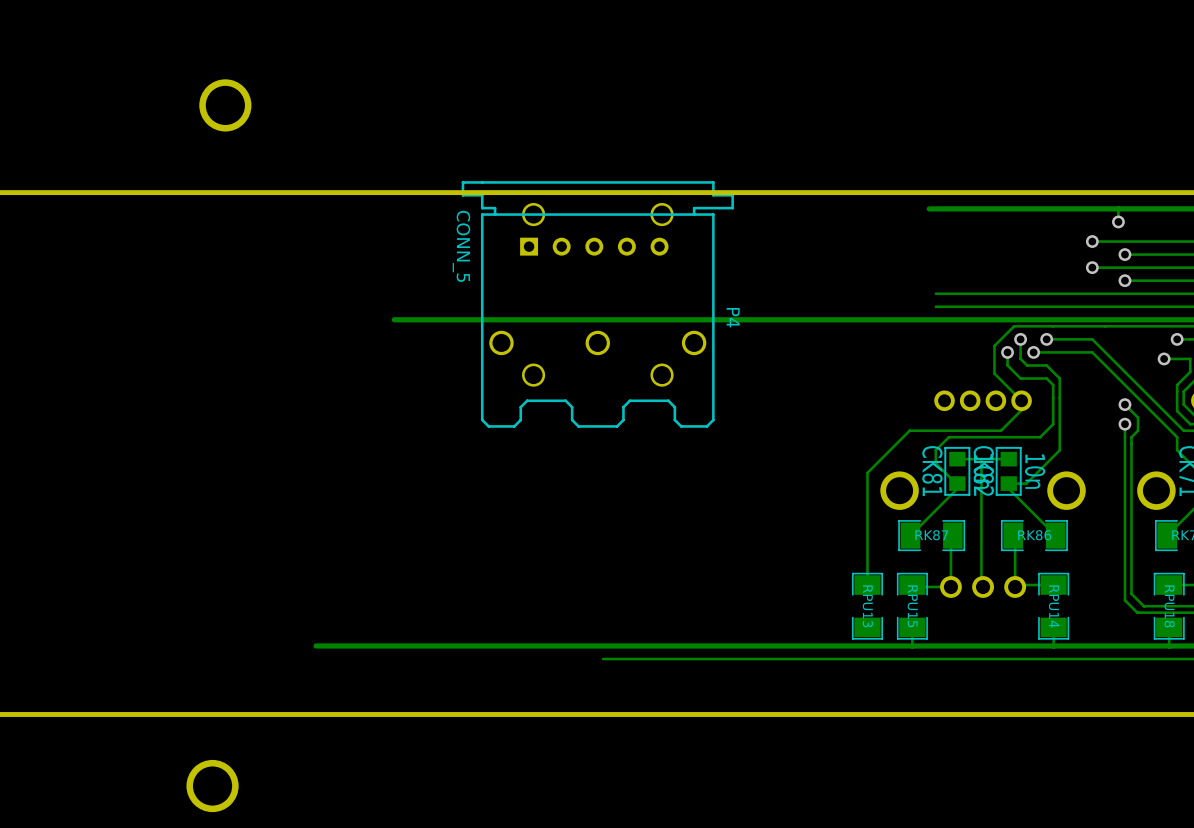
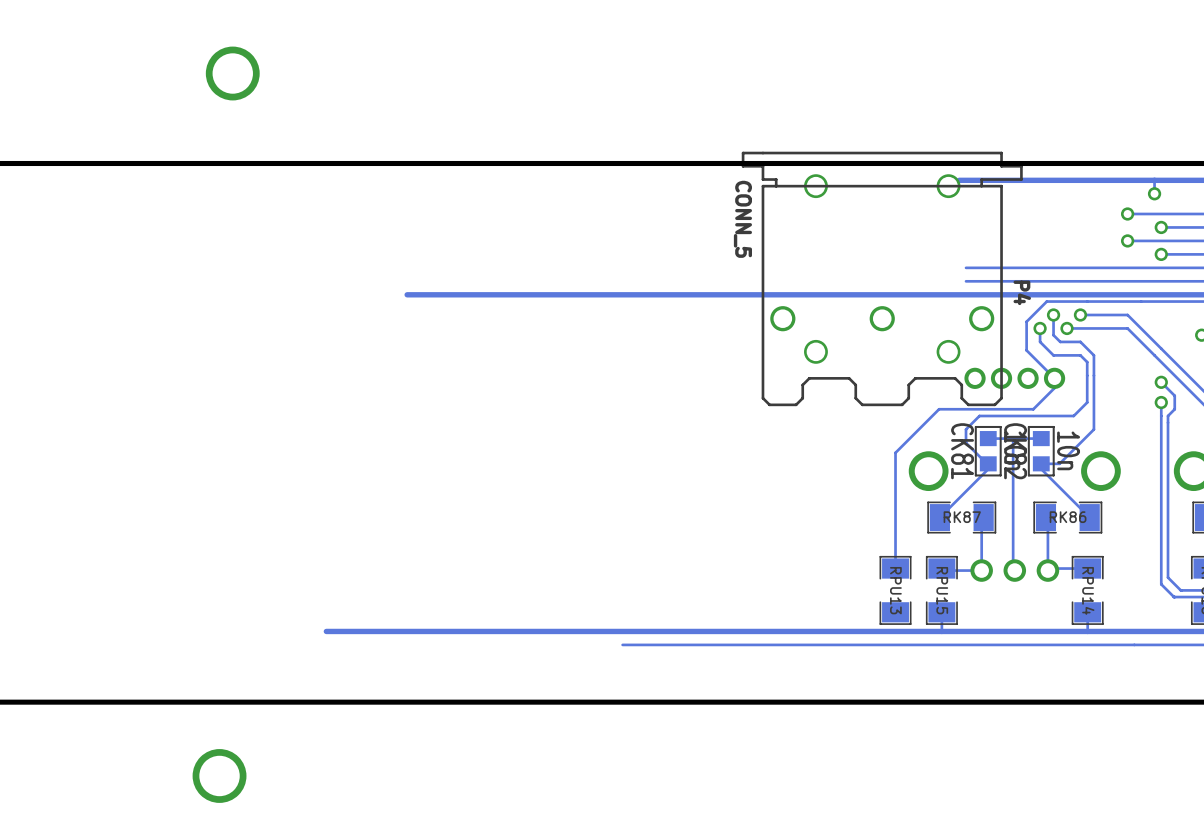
part: (594, 246) -> none
P4 position: (597, 304) -> (882, 278)

